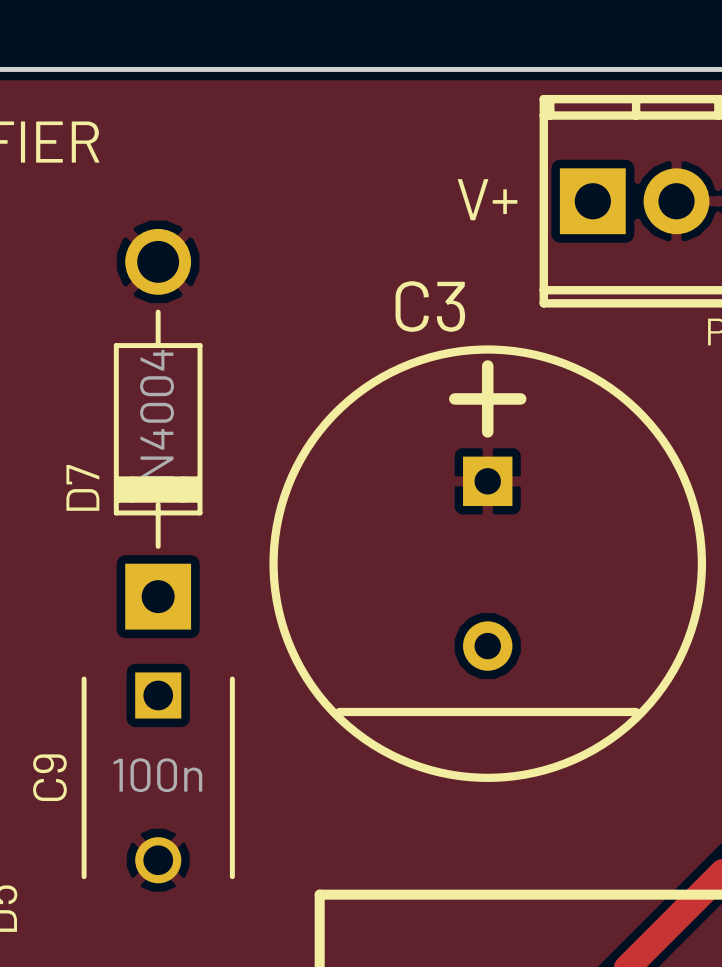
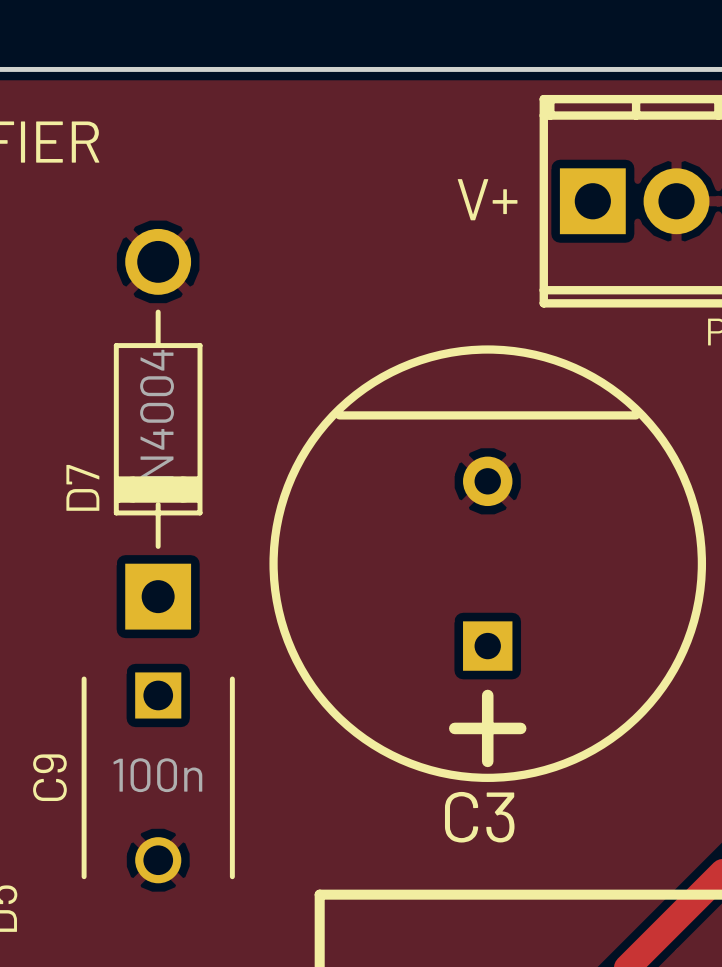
C3 name position: C3 (430, 306) -> C3 (479, 817)
C3 rotation: 0° (487, 563) -> 180° (487, 563)

